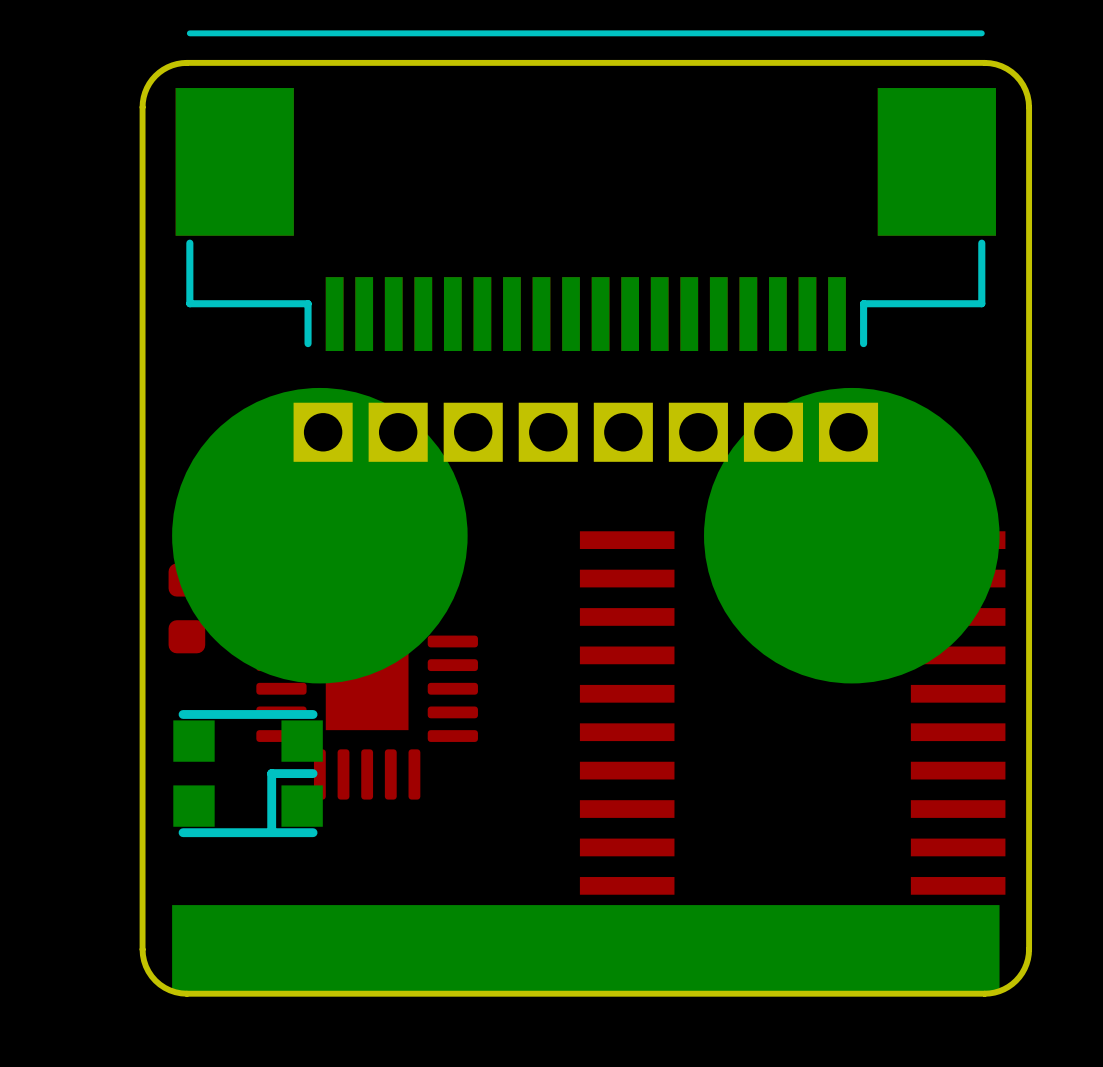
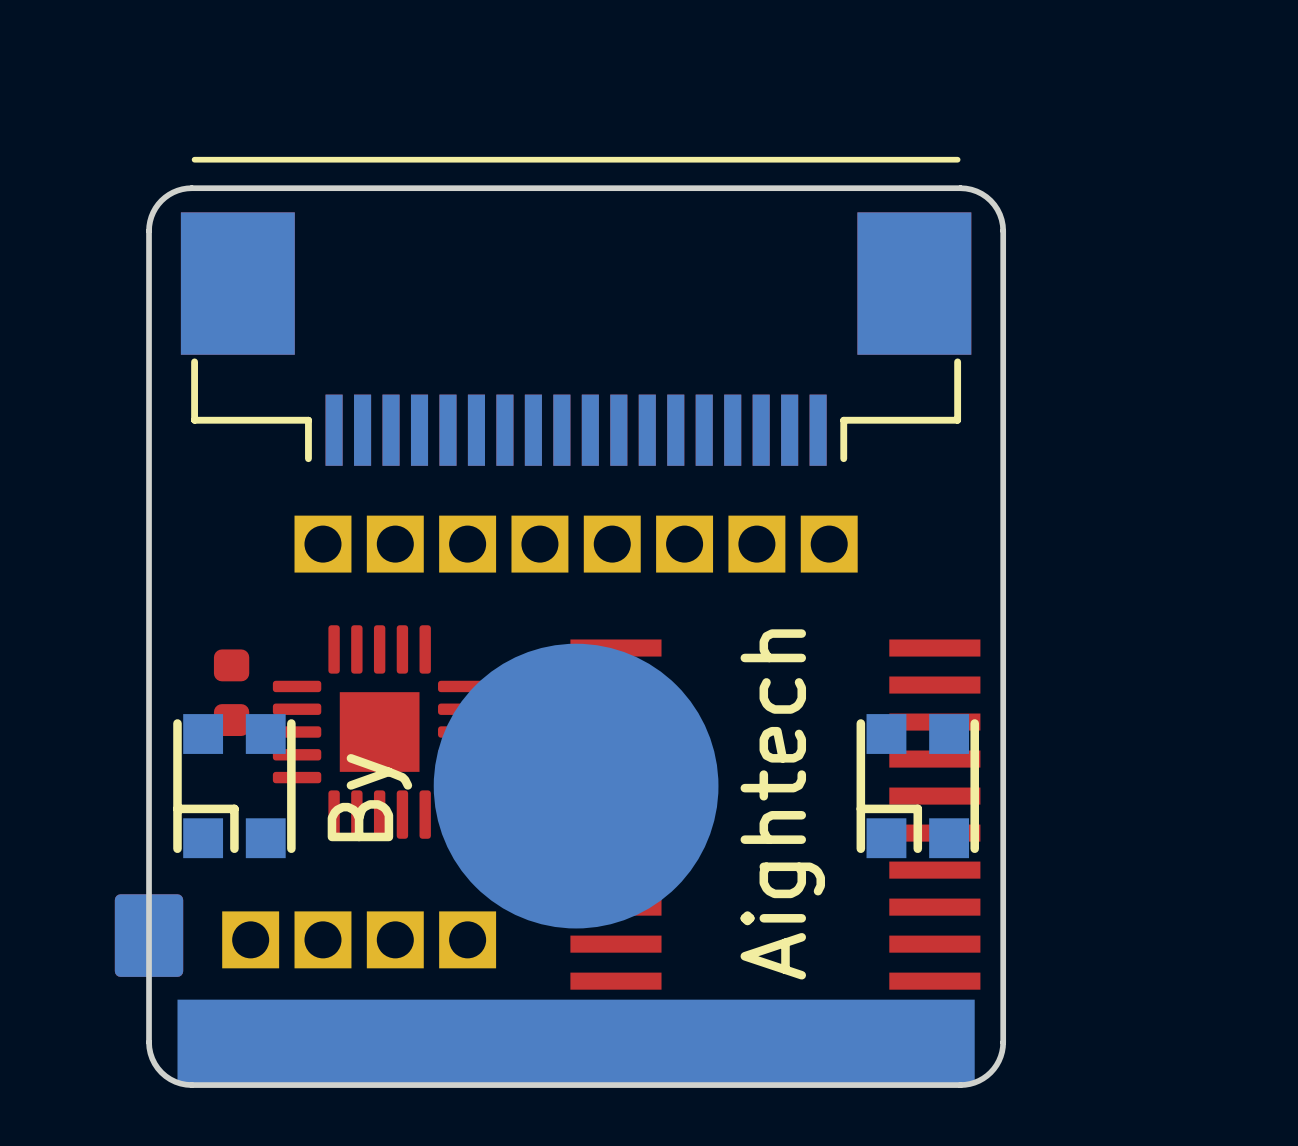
drawing: [172, 387, 468, 684] -> none
drawing: [704, 387, 1000, 684] -> none
drawing: none -> [433, 643, 719, 929]
part position: (186, 608) -> (231, 692)
part: none -> (917, 786)
part position: (367, 688) -> (379, 732)
text: none -> By (369, 797)
text: none -> Aightech (782, 804)
part rotation: 0° (248, 773) -> 90° clockwise (234, 786)
part position: (248, 773) -> (234, 786)
drawing: none -> [114, 894, 184, 977]
part: none -> (250, 939)
part: none -> (322, 939)
part: none -> (395, 939)
part: none -> (467, 939)

